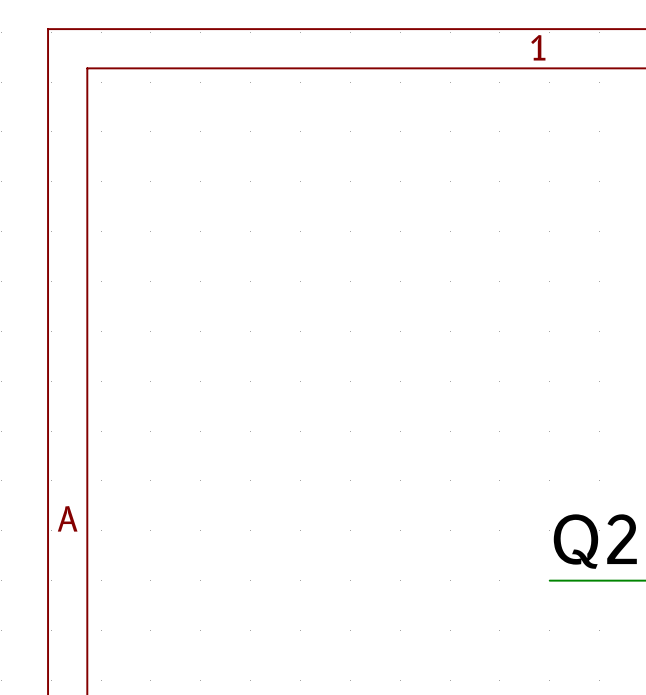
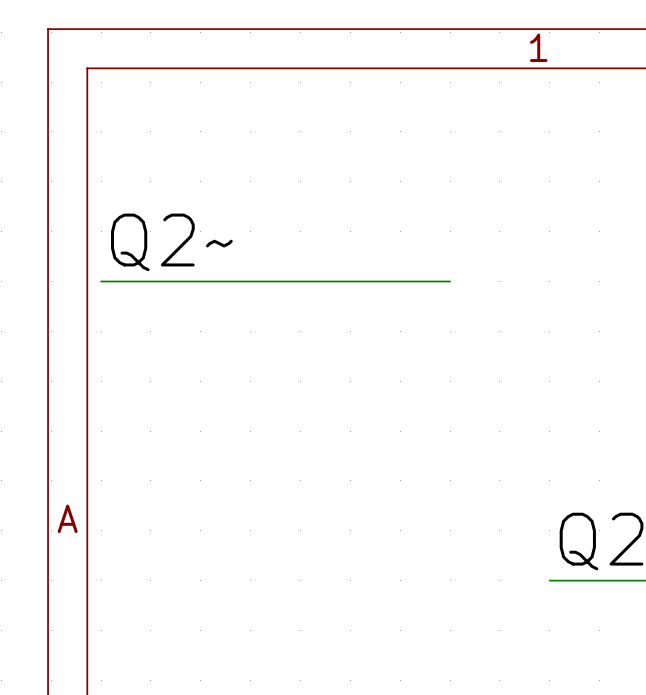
label: none -> Q2~ (171, 242)
wire: none -> (101, 281) (450, 281)

